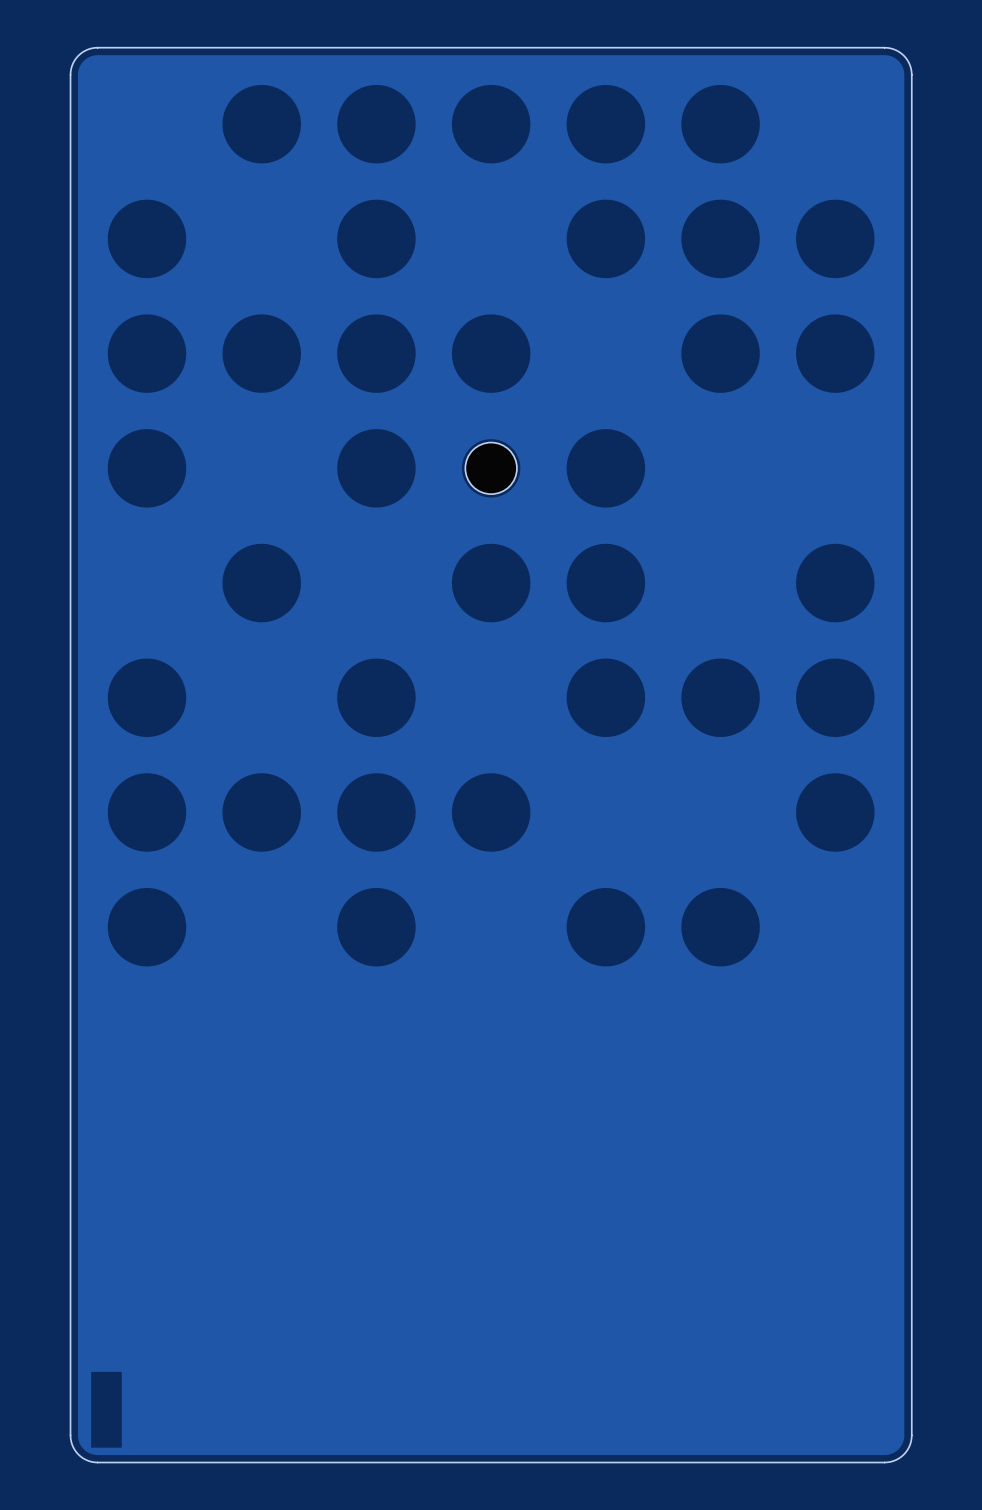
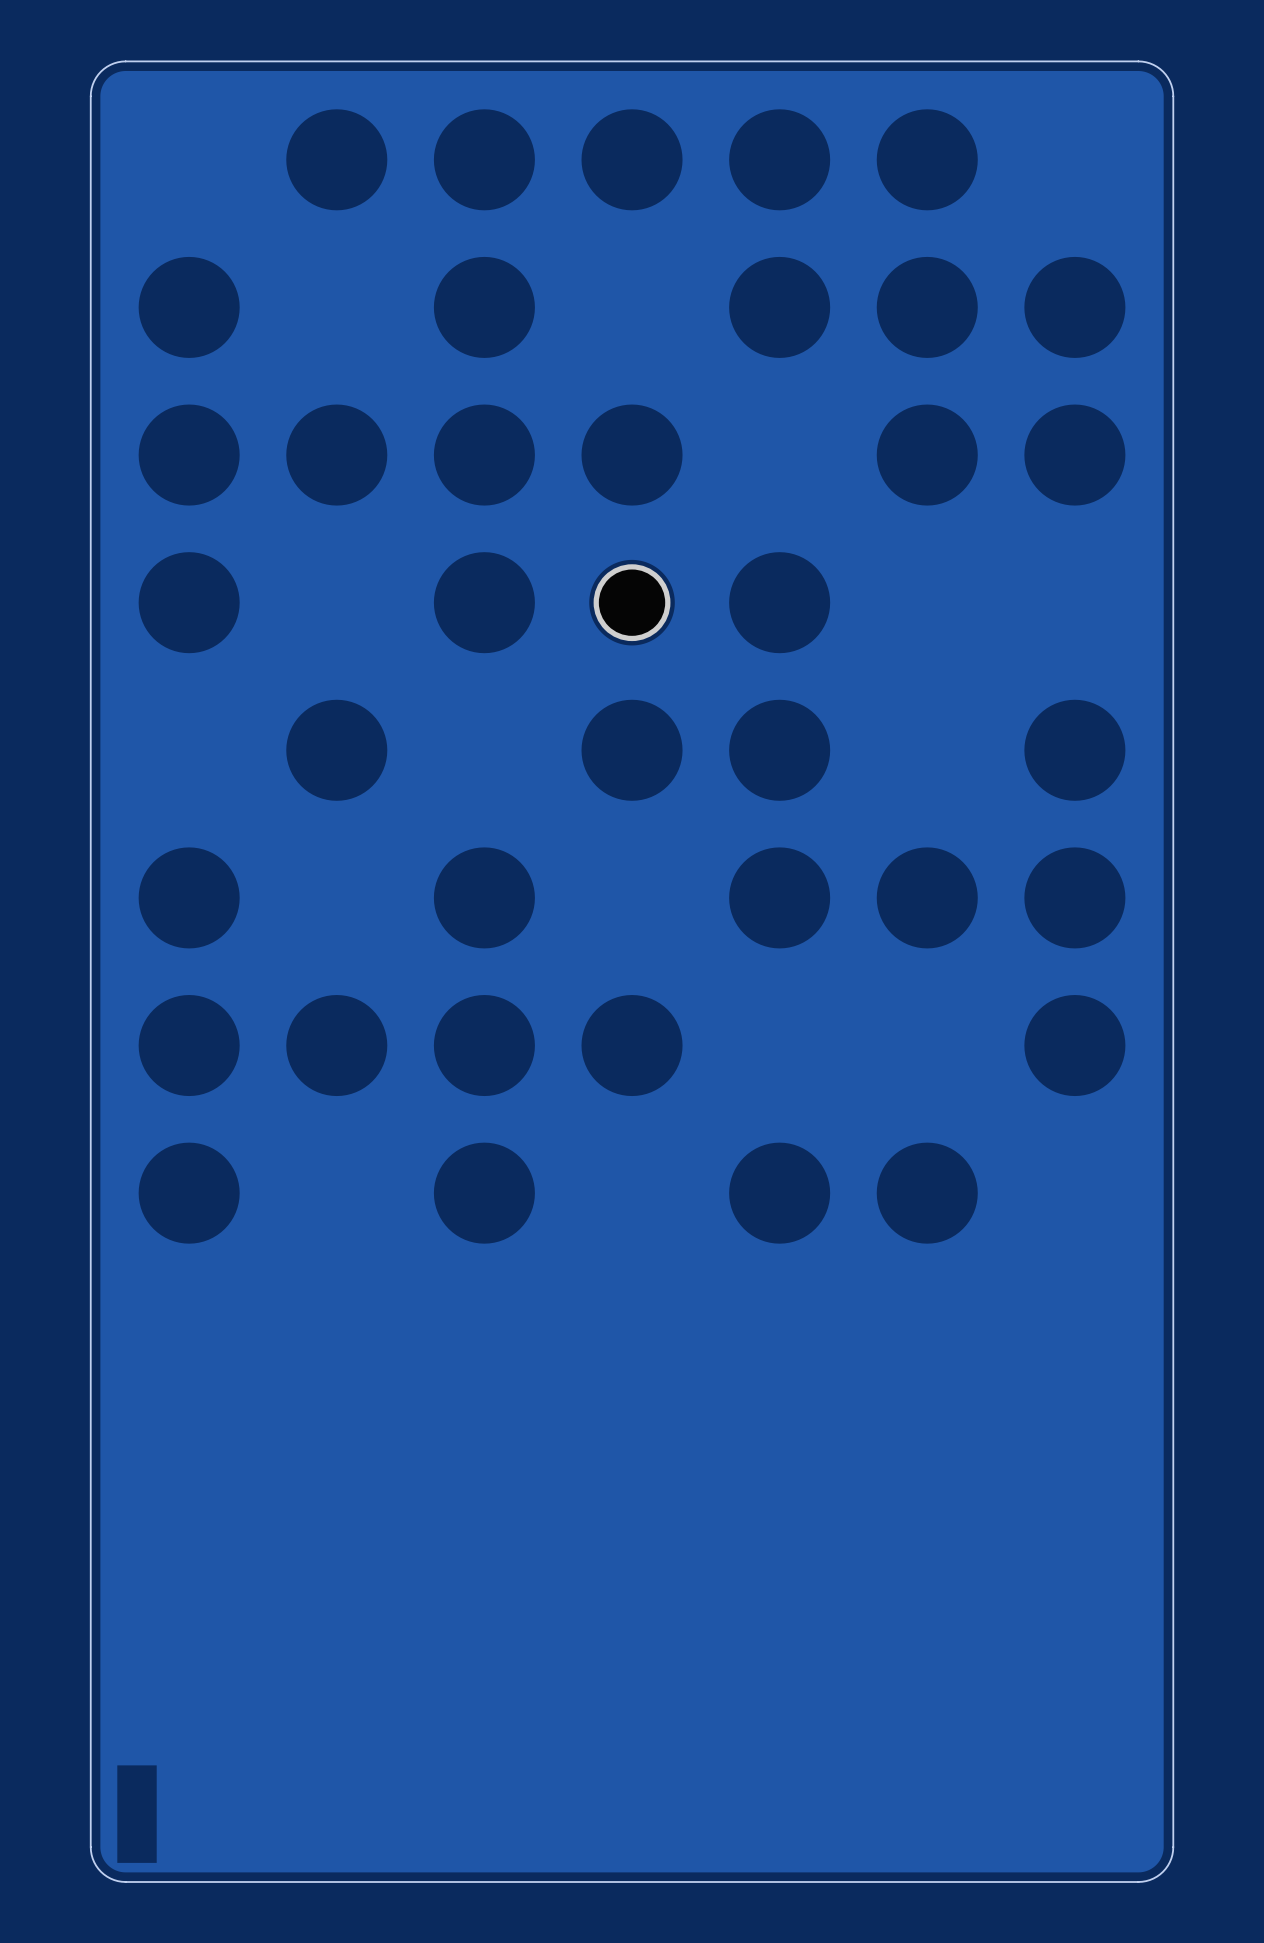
drawing shape: [77, 55, 905, 1456] -> [100, 71, 1164, 1873]
part footprint: [465, 442, 517, 495] -> [593, 564, 671, 642]

